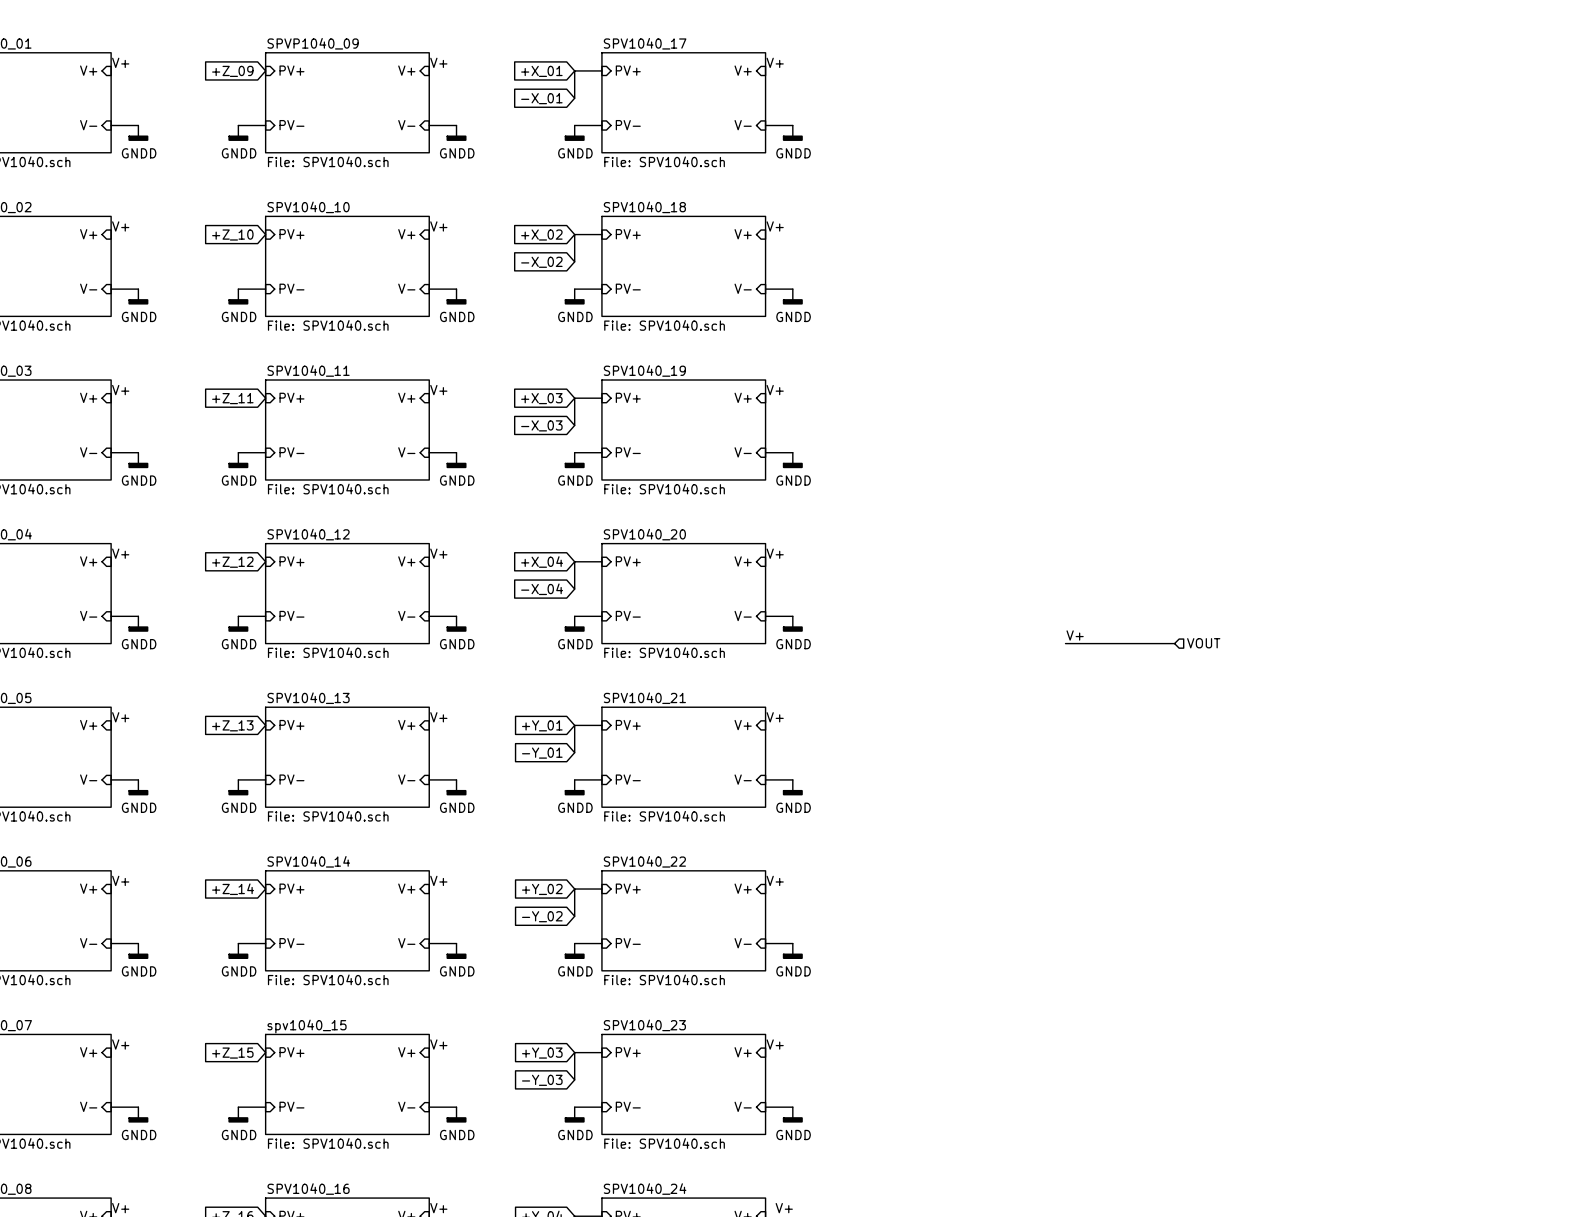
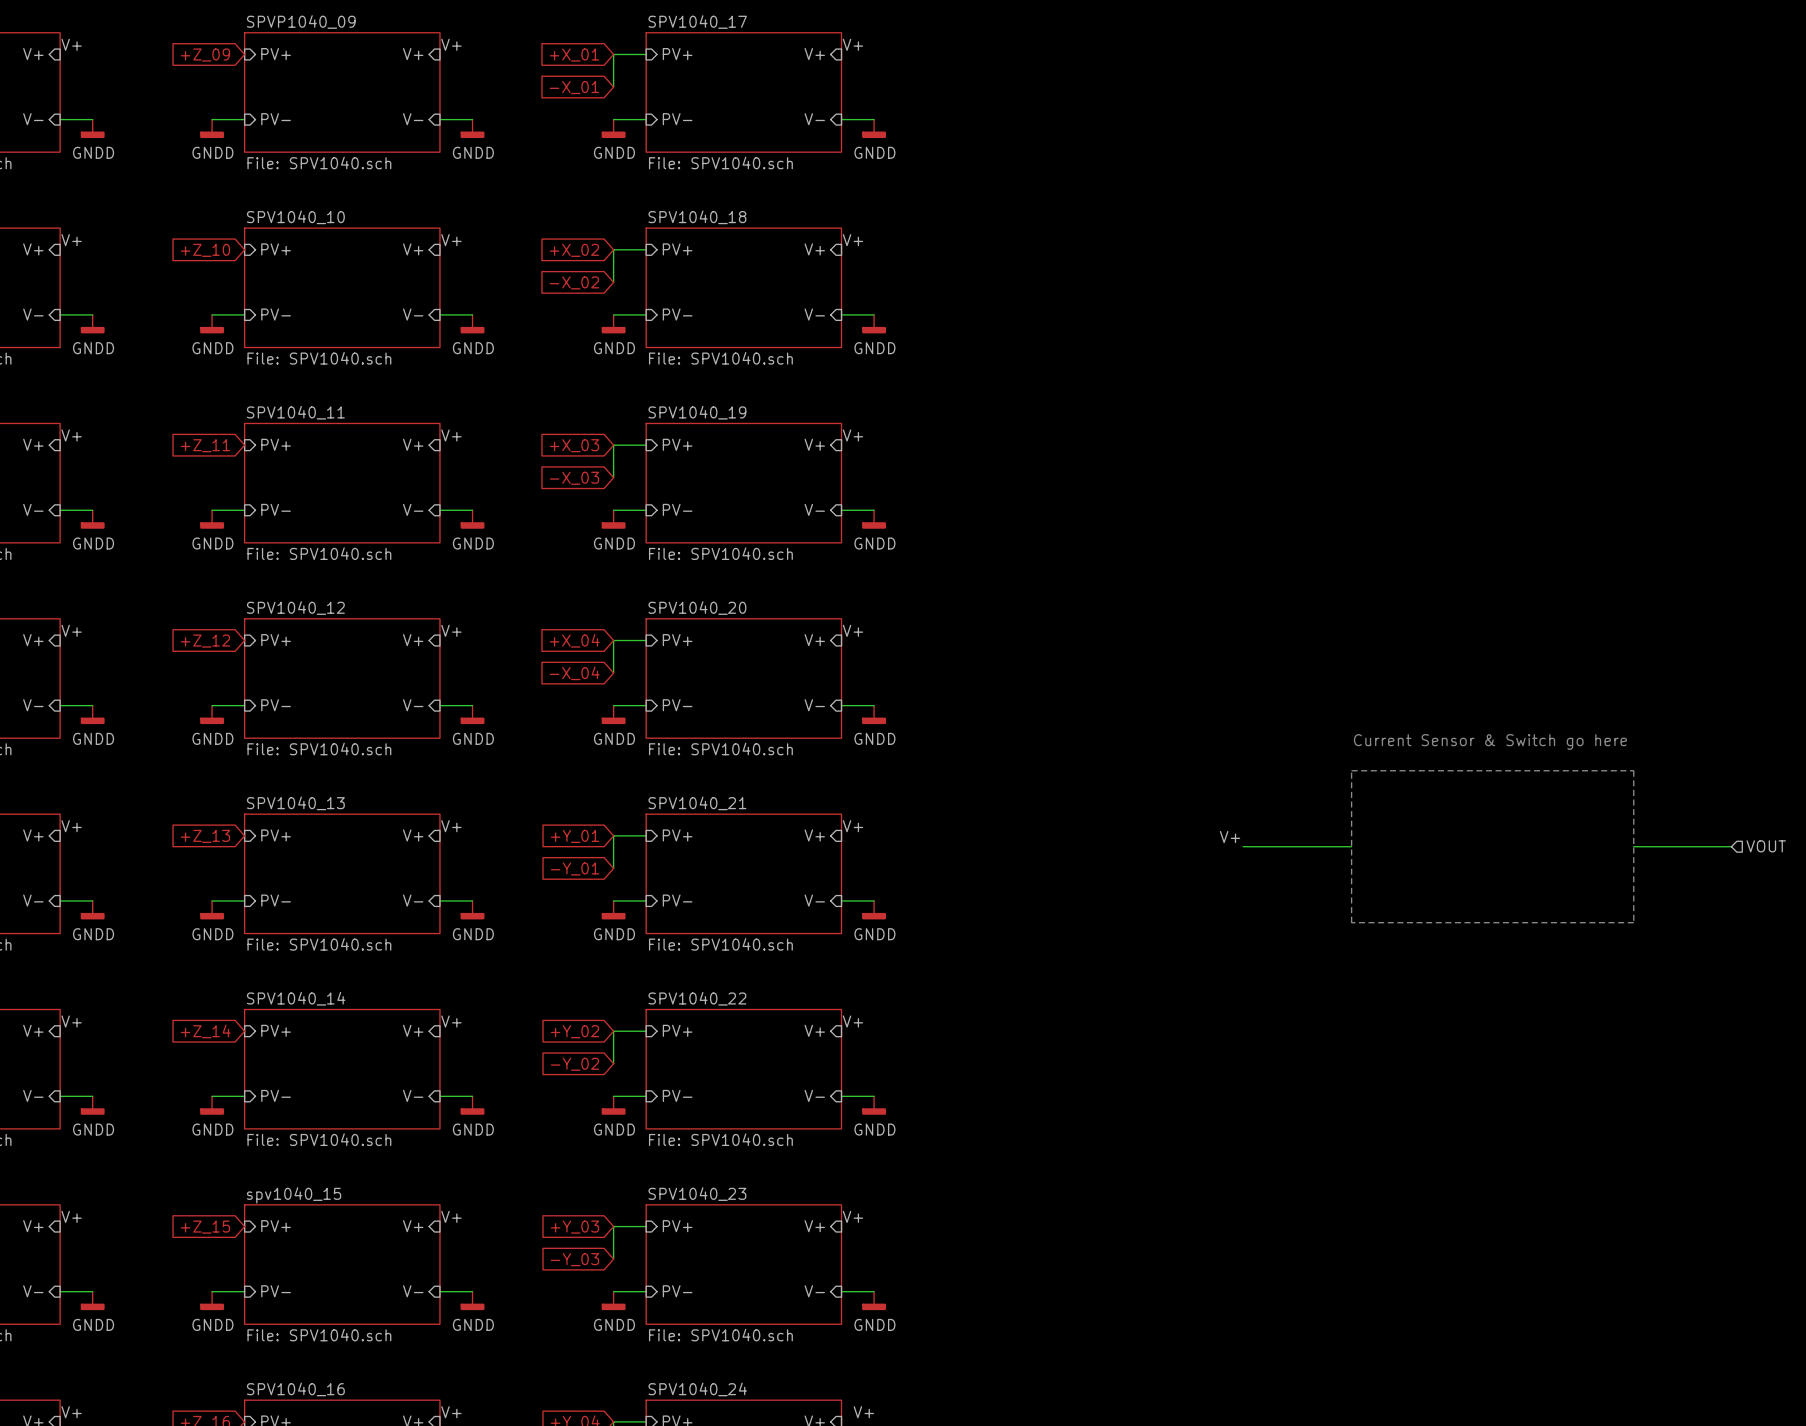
label position: V+ (1075, 635) -> V+ (1230, 837)
wire: (1065, 643) (1174, 643) -> none
hierarchical label: VOUT (1203, 643) -> none
text: none -> Current Sensor & Switch go here (1490, 741)
line: none -> (1351, 770) (1351, 922) (1633, 922) (1633, 770) (1351, 770)
wire: none -> (1243, 846) (1351, 846)
wire: none -> (1633, 846) (1731, 846)
hierarchical label: none -> VOUT (1766, 846)

